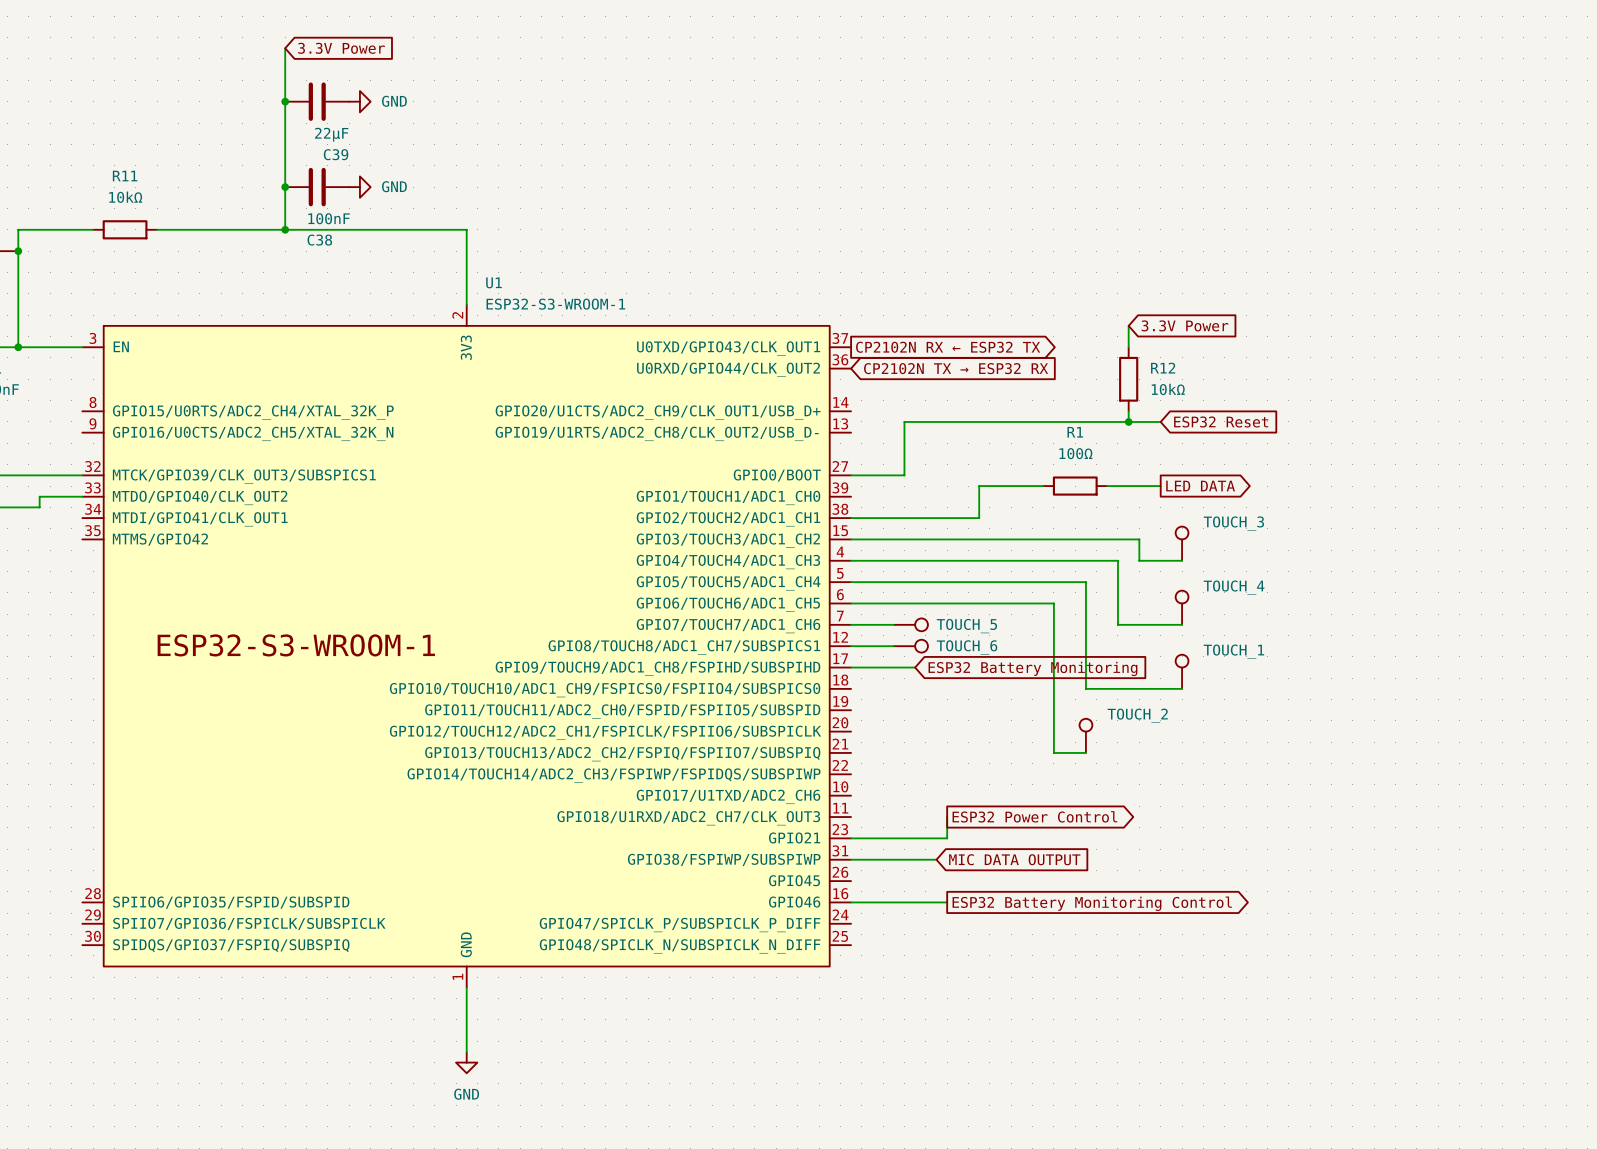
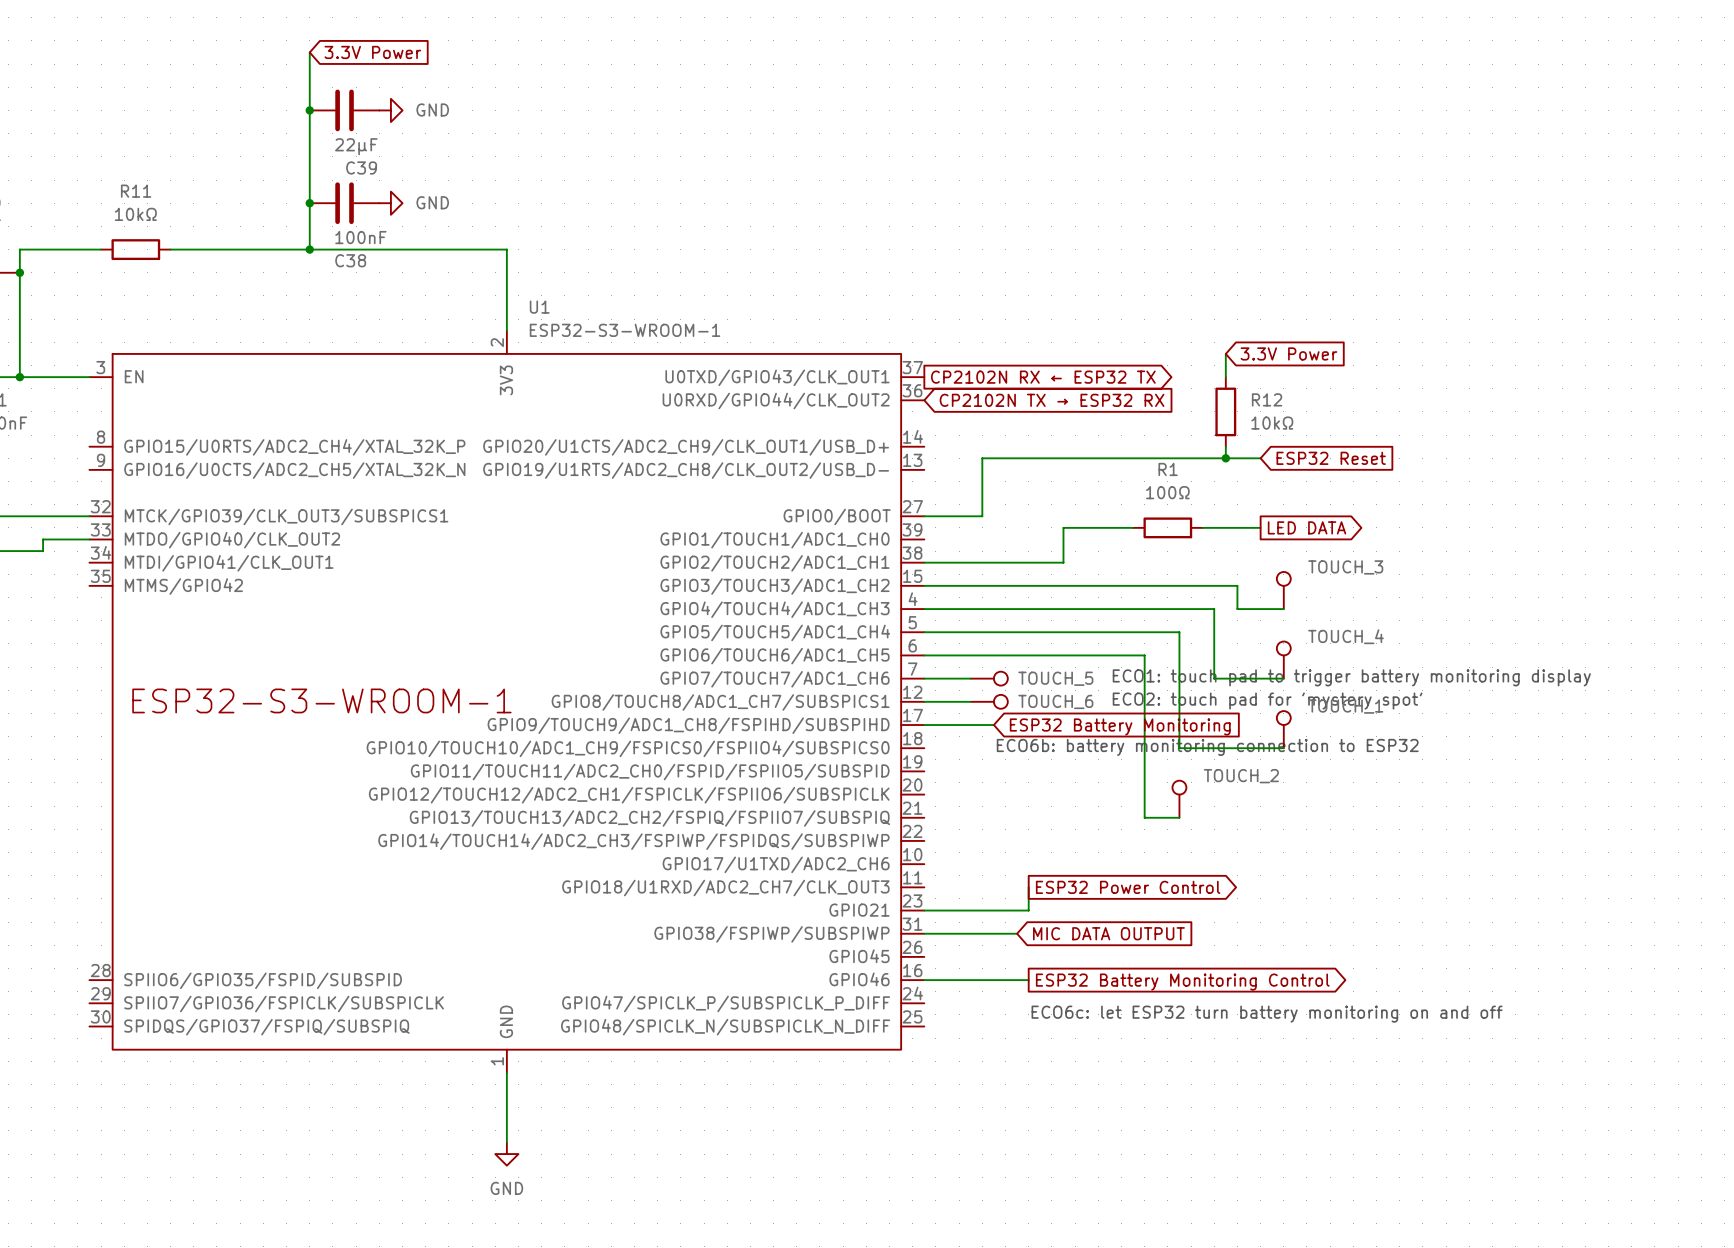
text: none -> ECO1: touch pad to trigger battery monitoring display (1351, 677)
text: none -> ECO2: touch pad for 'mystery spot' (1267, 701)
text: none -> ECO6b: battery monitoring connection to ESP32 (1207, 747)
text: none -> ECO6c: let ESP32 turn battery monitoring on and off (1267, 1014)

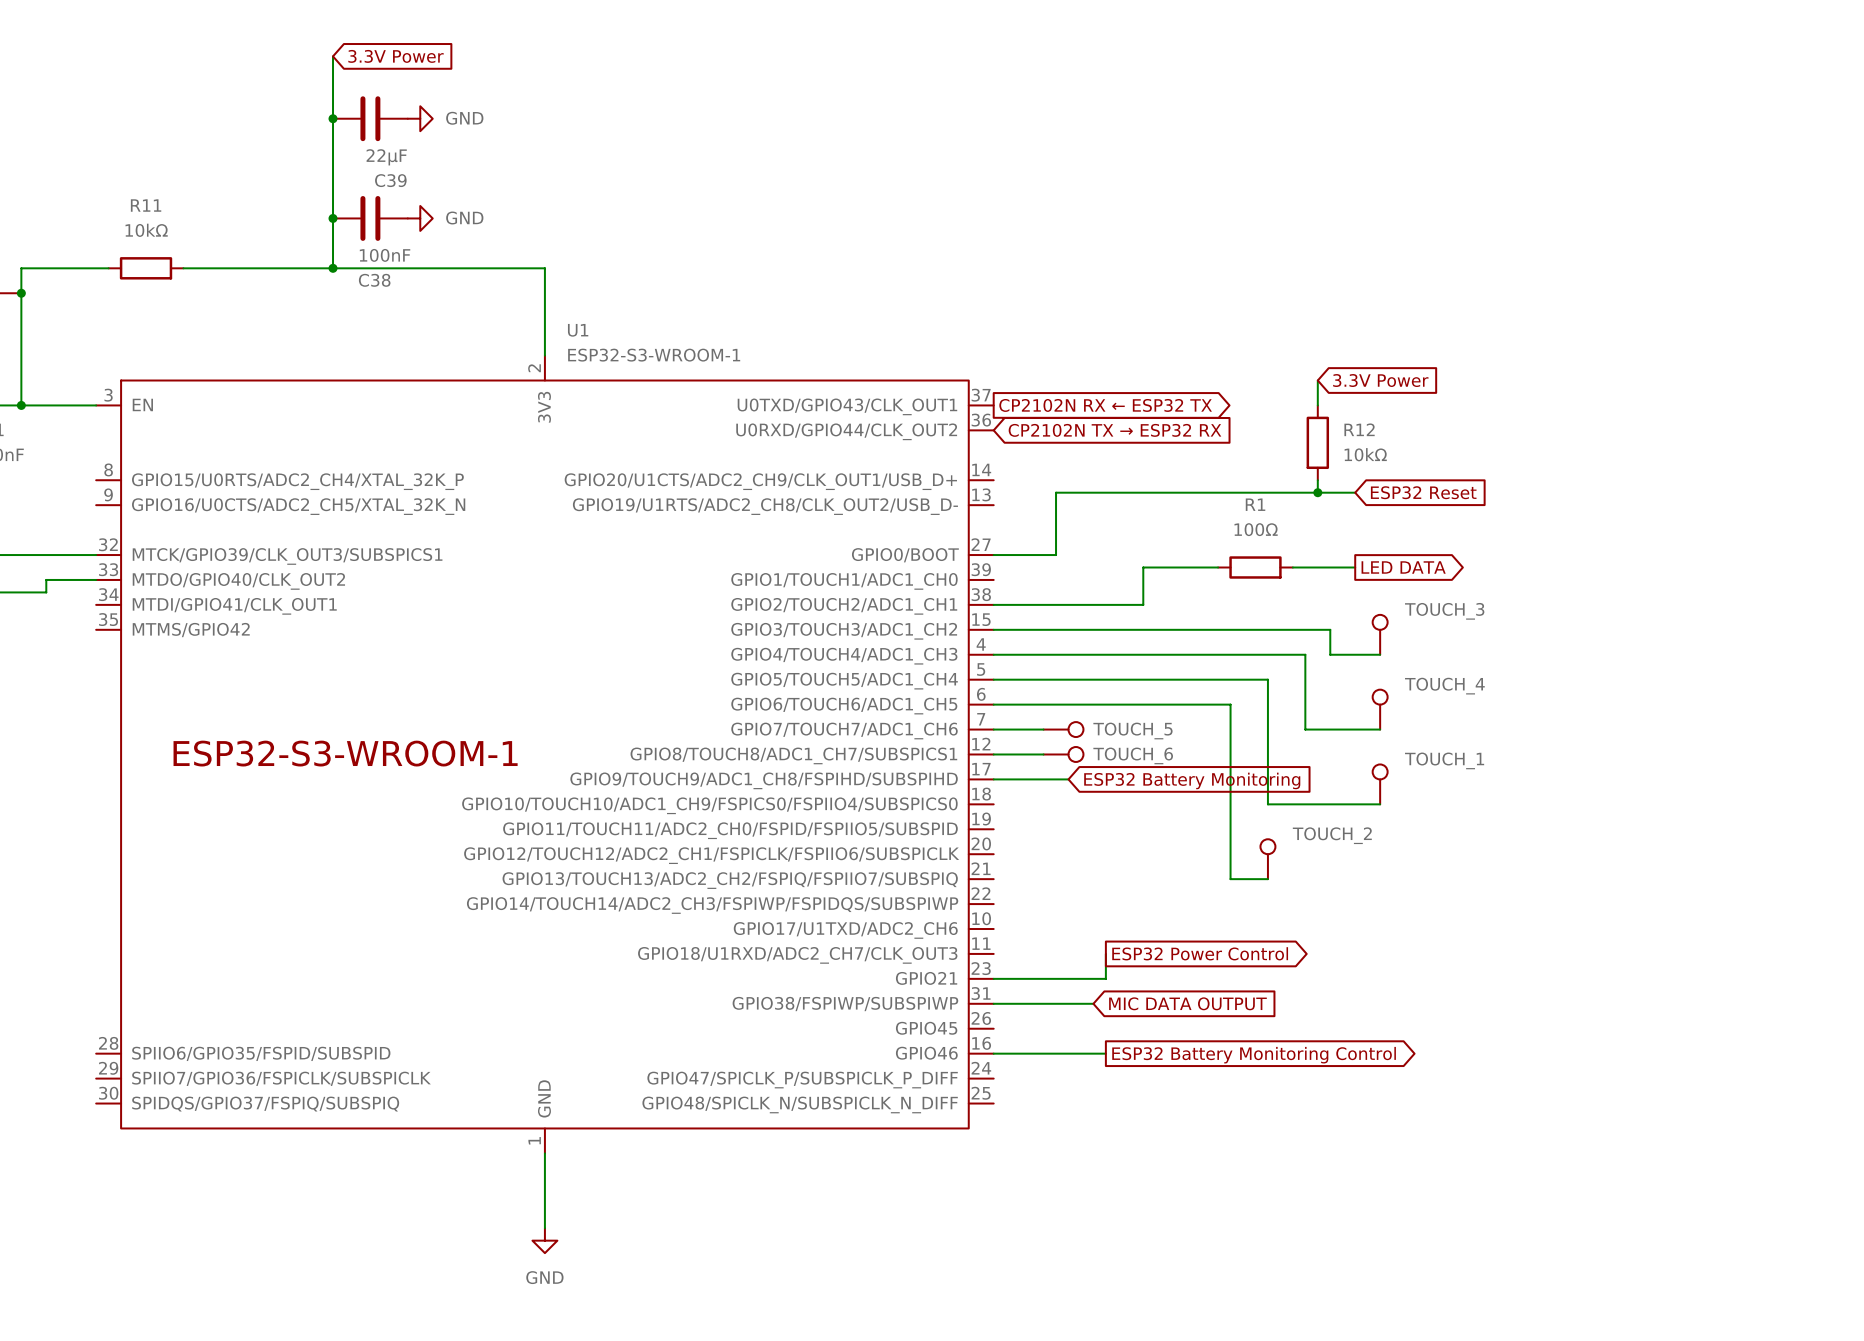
text: ECO1: touch pad to trigger battery monitoring display (1351, 677) -> none
text: ECO2: touch pad for 'mystery spot' (1267, 701) -> none
text: ECO6b: battery monitoring connection to ESP32 (1207, 747) -> none
text: ECO6c: let ESP32 turn battery monitoring on and off (1267, 1014) -> none

